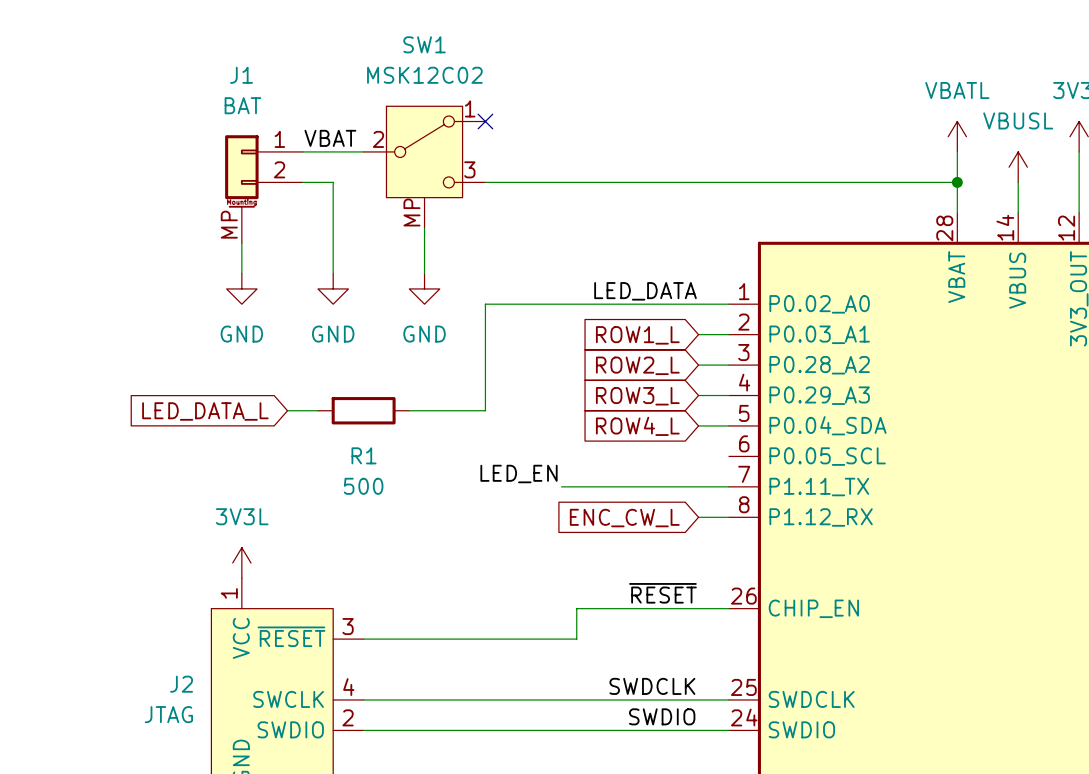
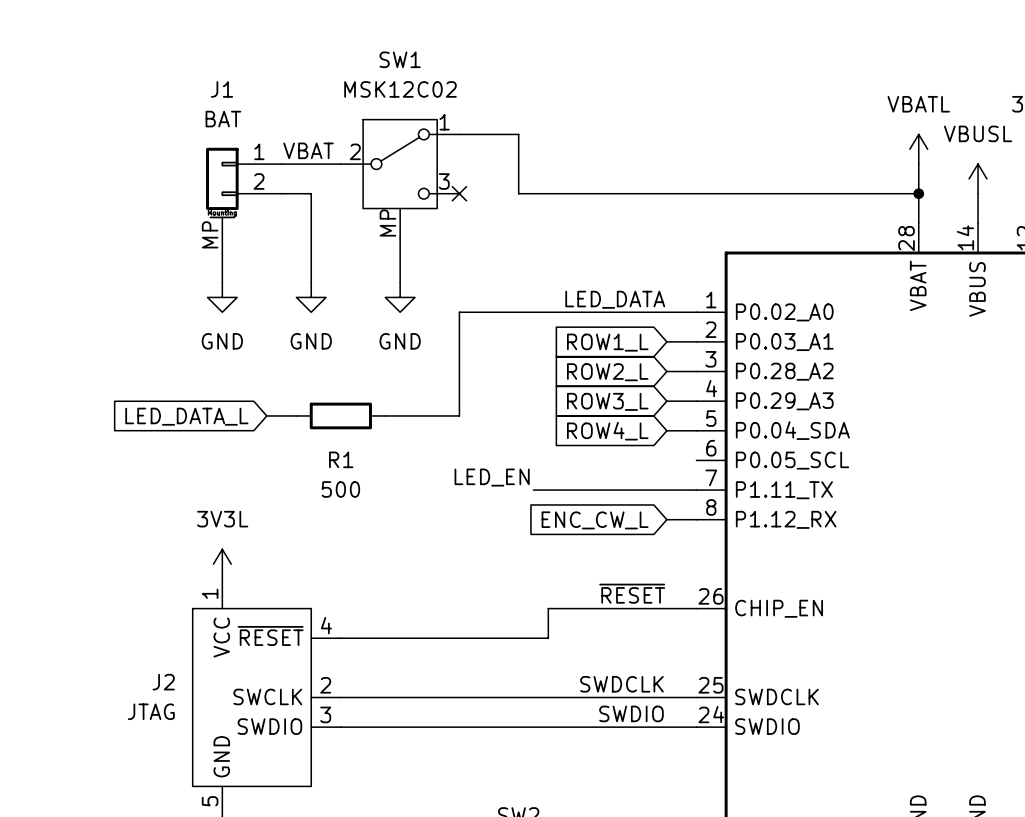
no-connect mark position: (485, 121) -> (459, 193)
wire: (485, 182) (546, 182) -> (459, 134) (518, 134) (518, 193)
J2 pin number: 3 (348, 626) -> 4 (326, 625)
J2 pin number: 4 (348, 687) -> 2 (325, 685)
J2 pin number: 2 (348, 717) -> 3 (325, 714)

